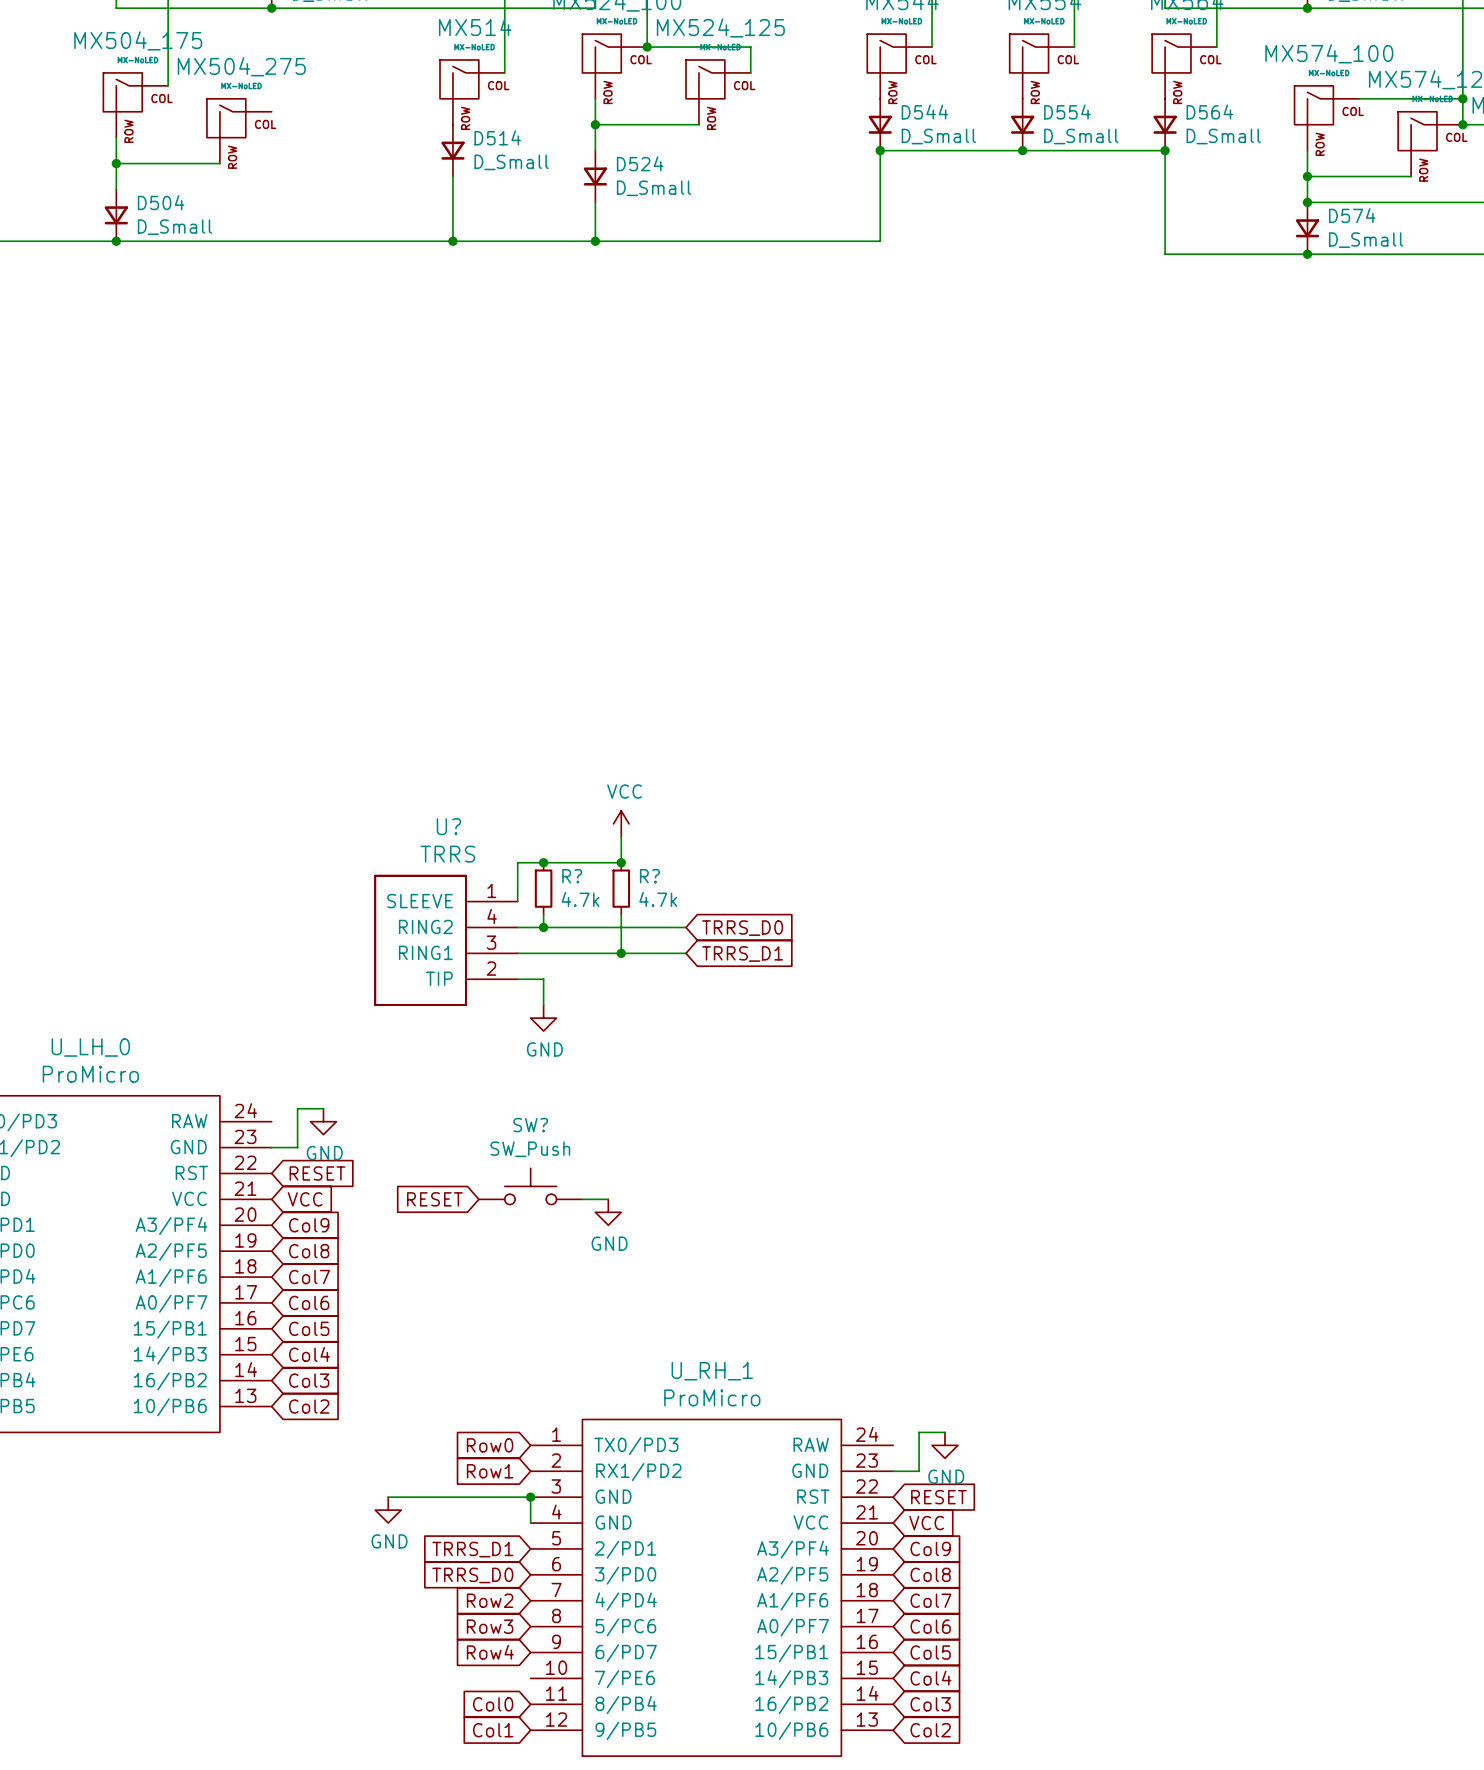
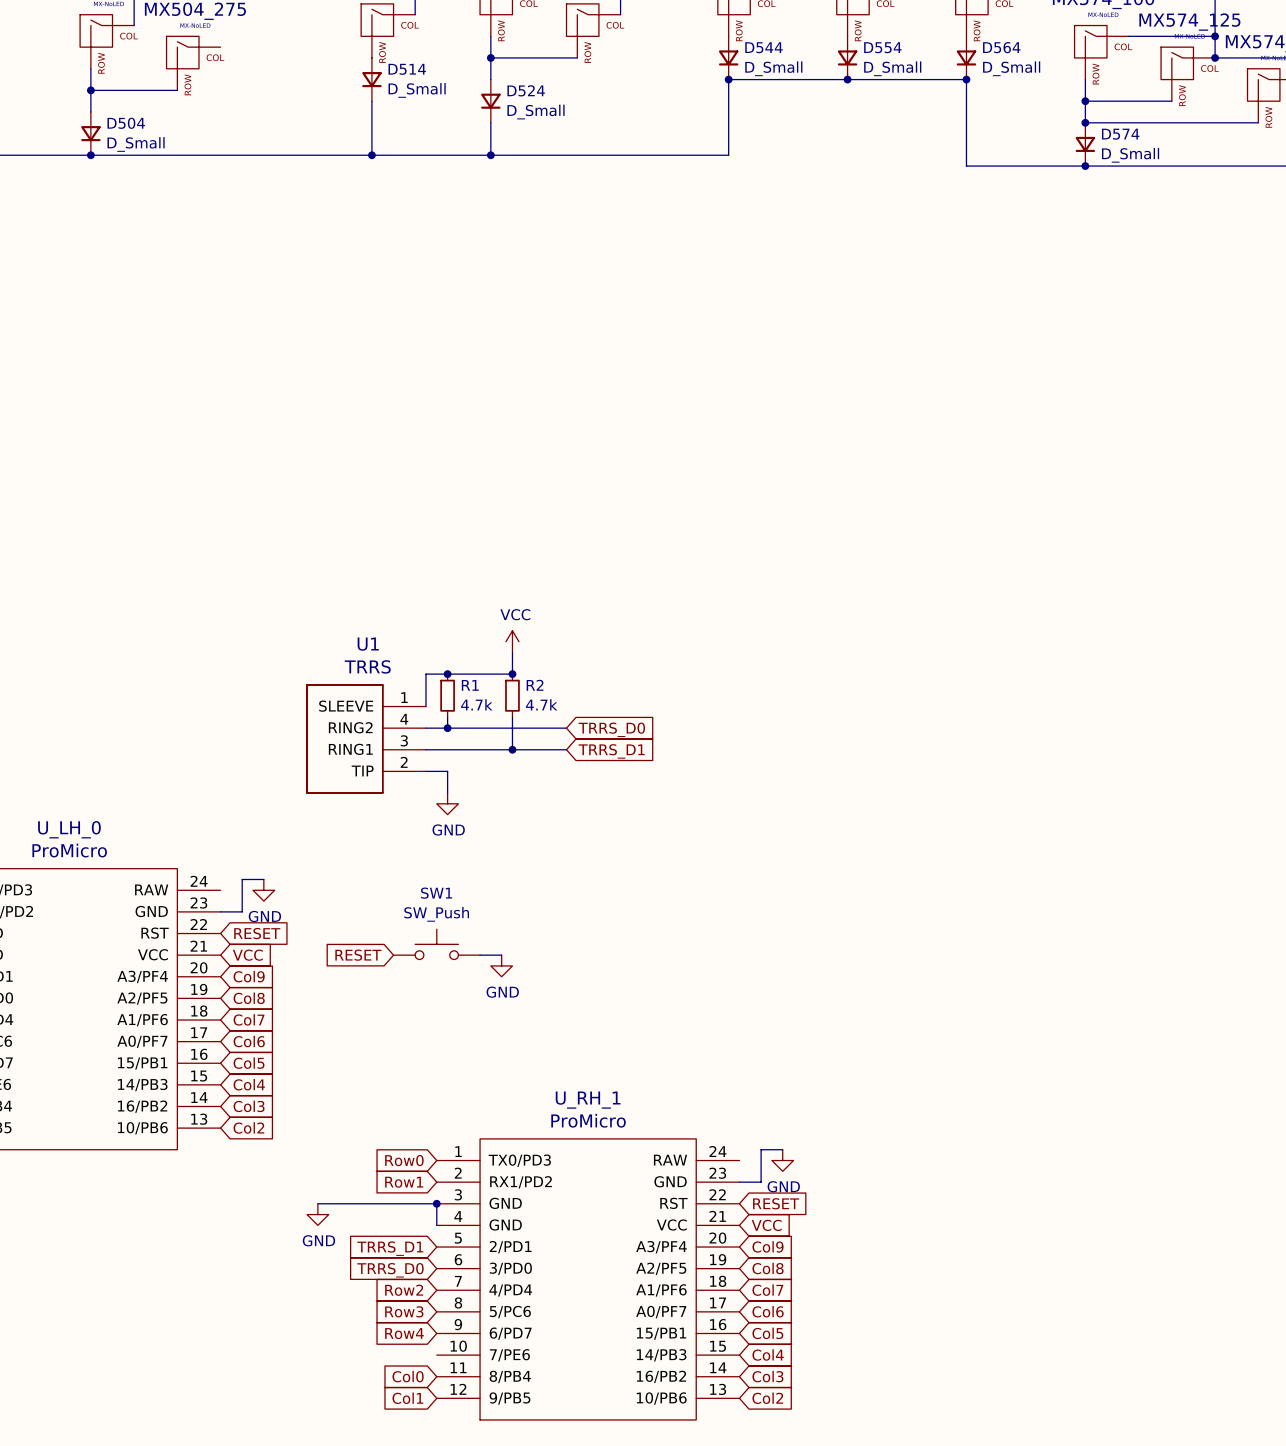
U? name: U? (448, 826) -> U1 (368, 644)
R? name: R? (572, 876) -> R1 (470, 685)
R? name: R? (649, 876) -> R2 (535, 685)
SW? name: SW? (530, 1125) -> SW1 (436, 893)

